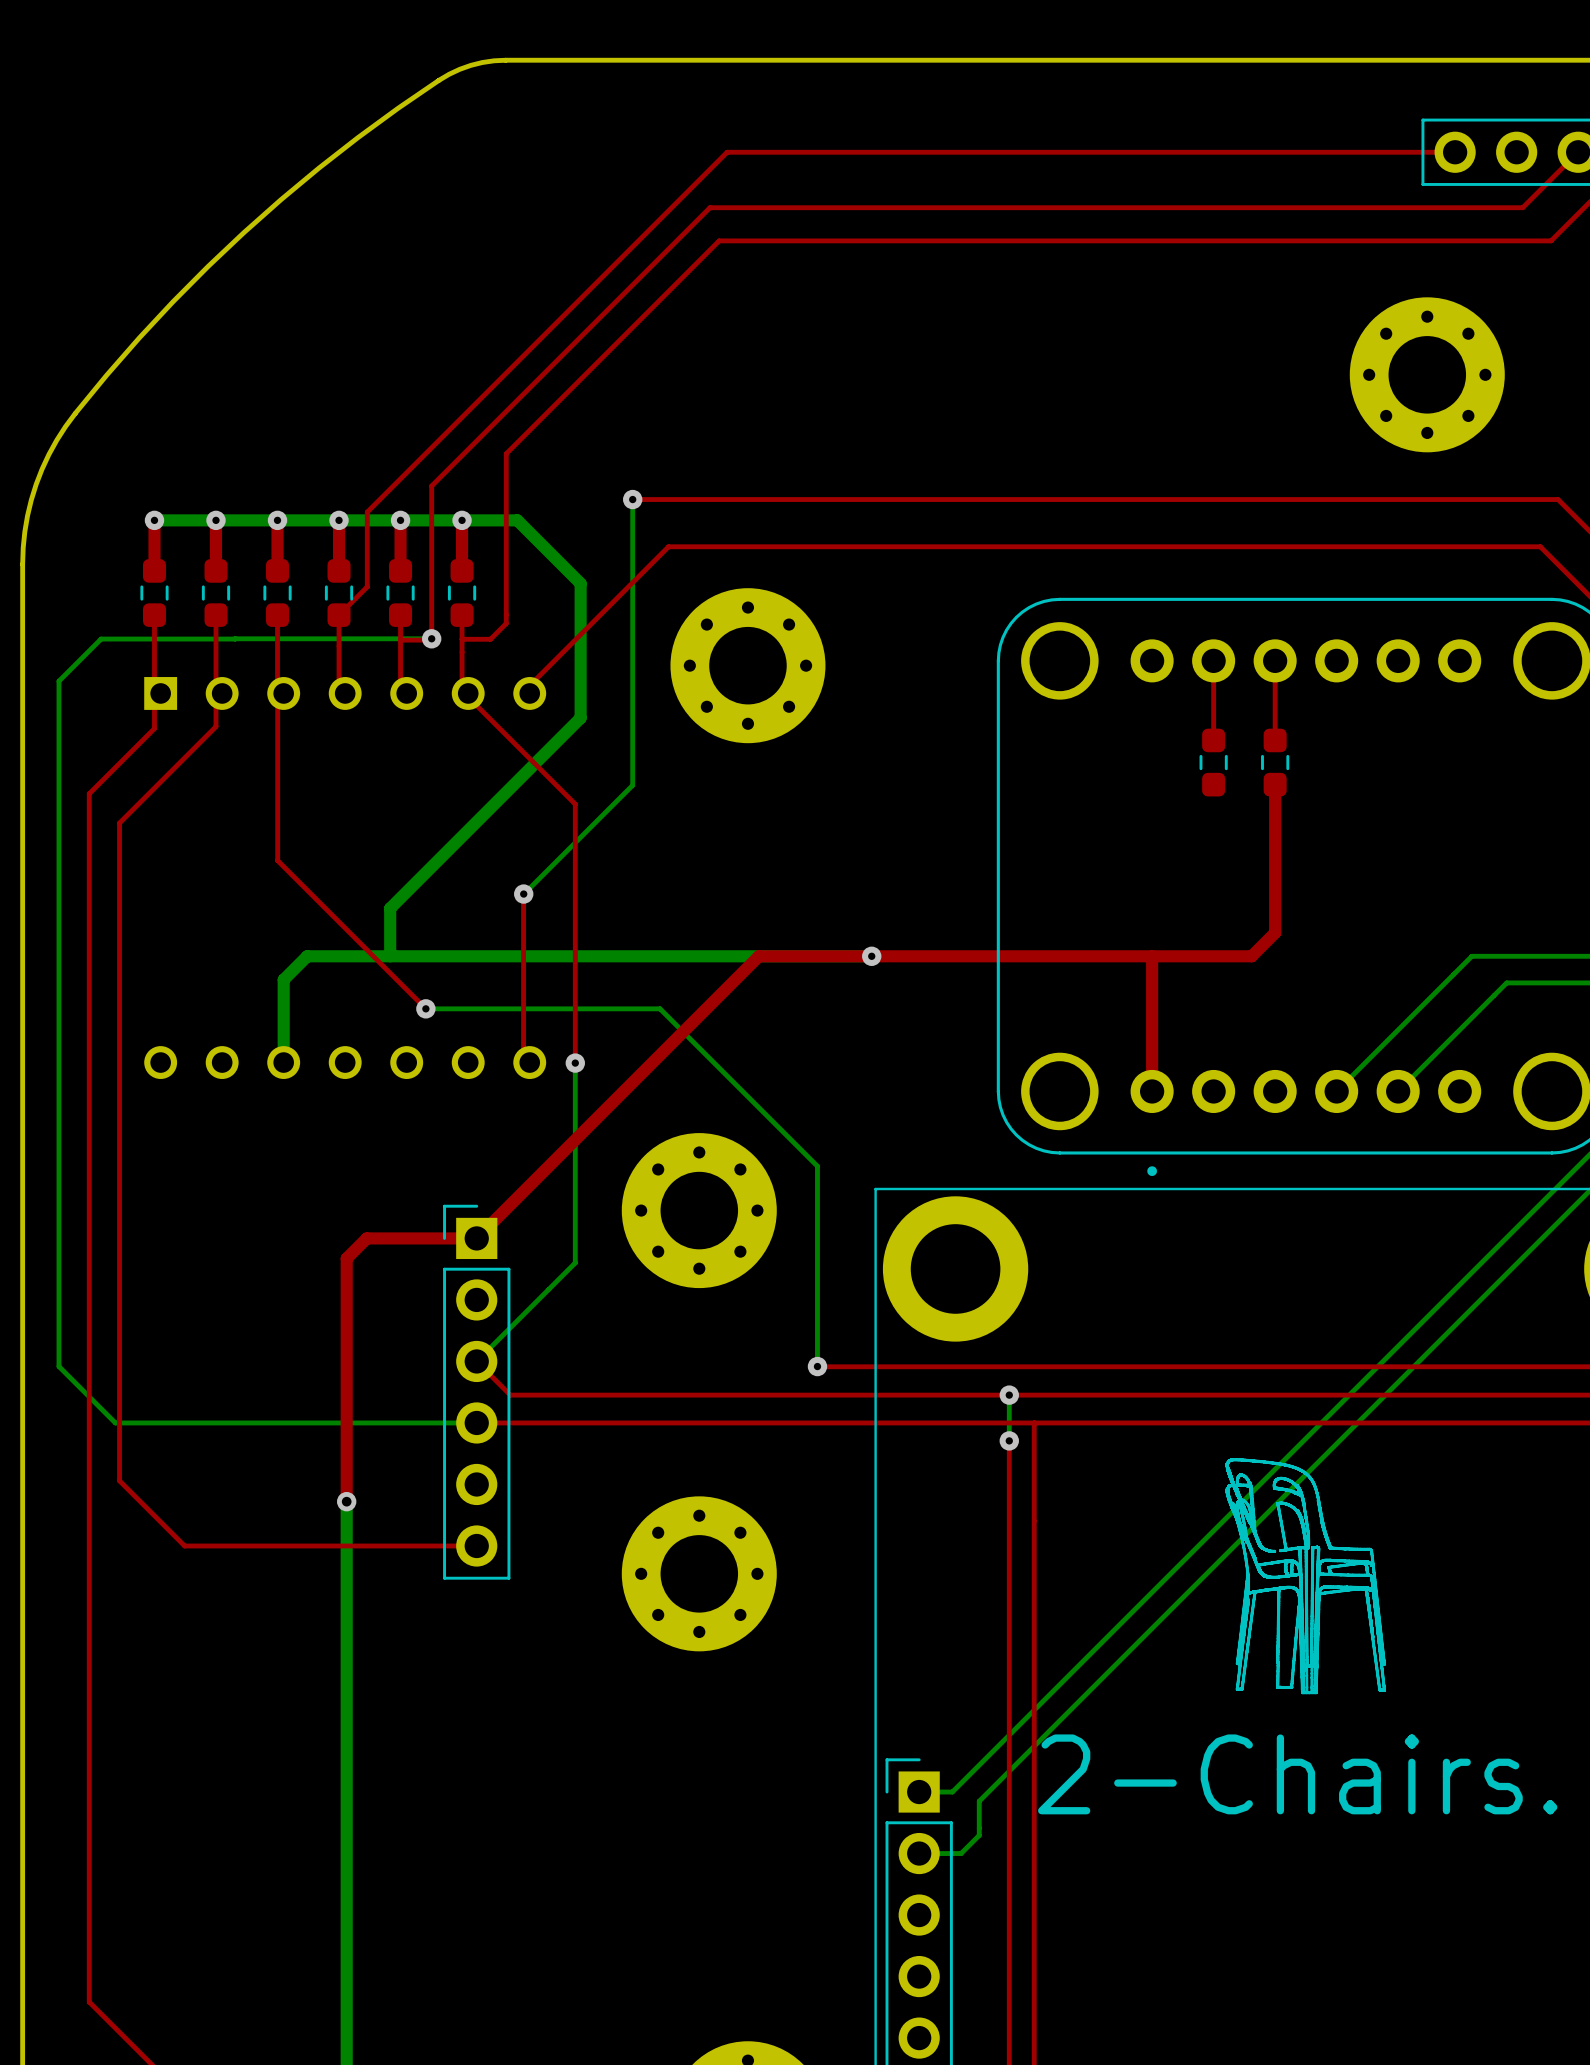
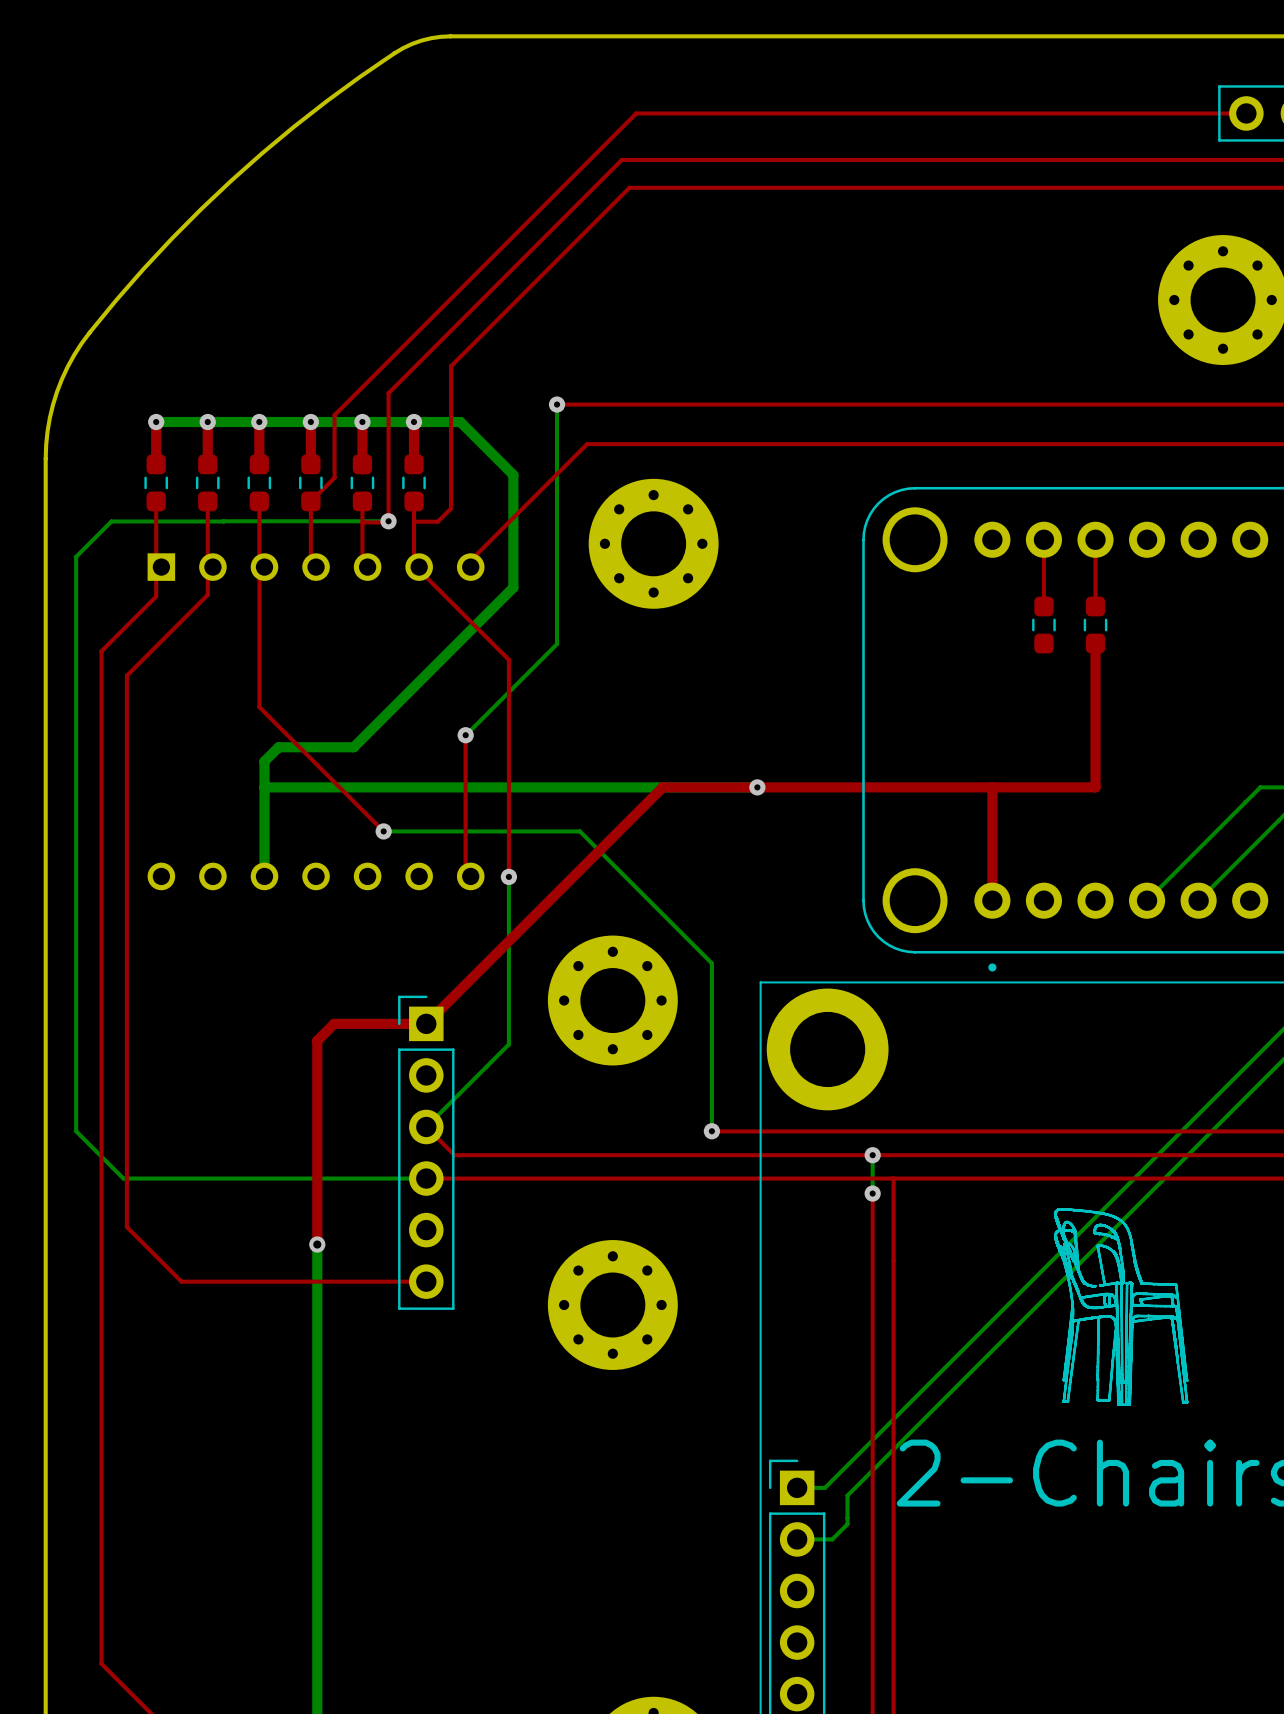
bottom track: (390, 908) (390, 956) -> (353, 747) (278, 747) (264, 761) (264, 807)
top track: (1275, 932) (1251, 956) -> (1095, 767) (1095, 787) (1075, 787)
bottom track: (307, 956) (283, 979) -> (284, 787) (264, 787)

